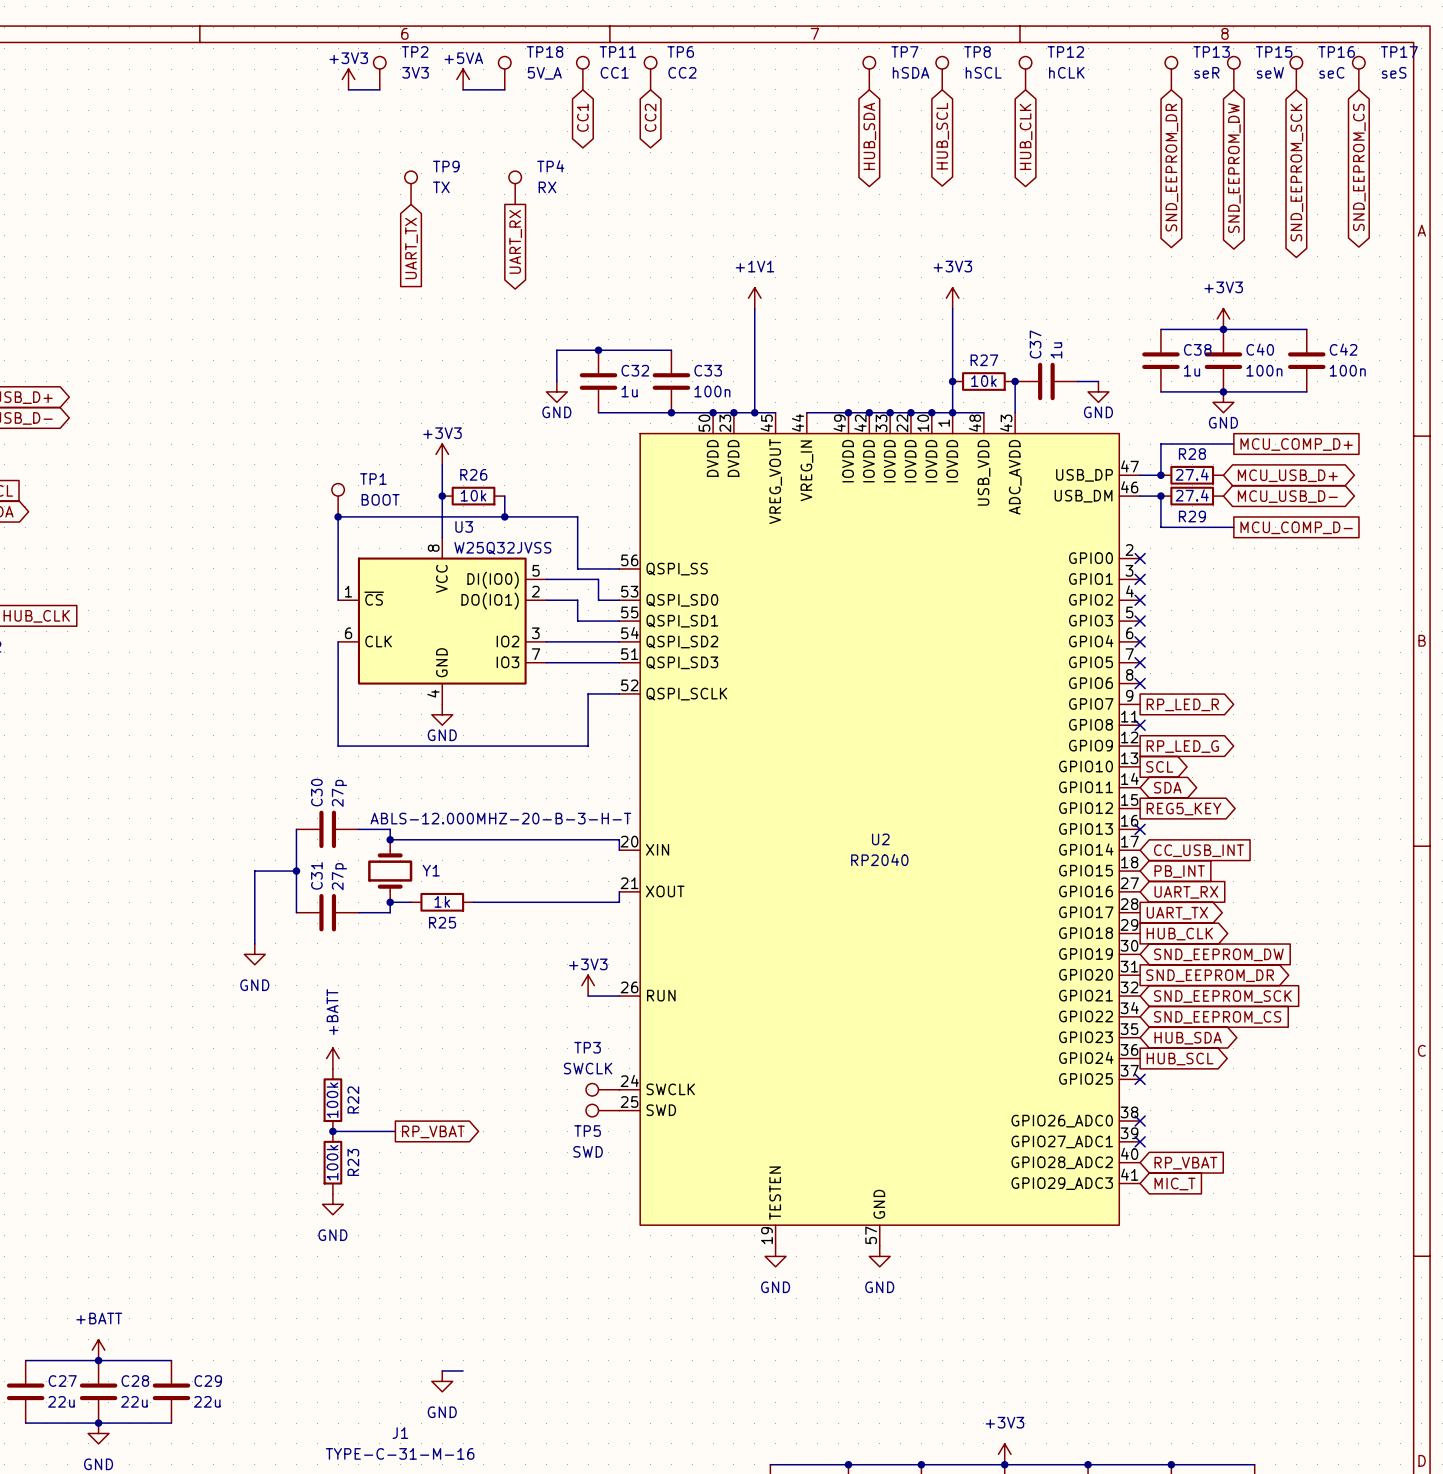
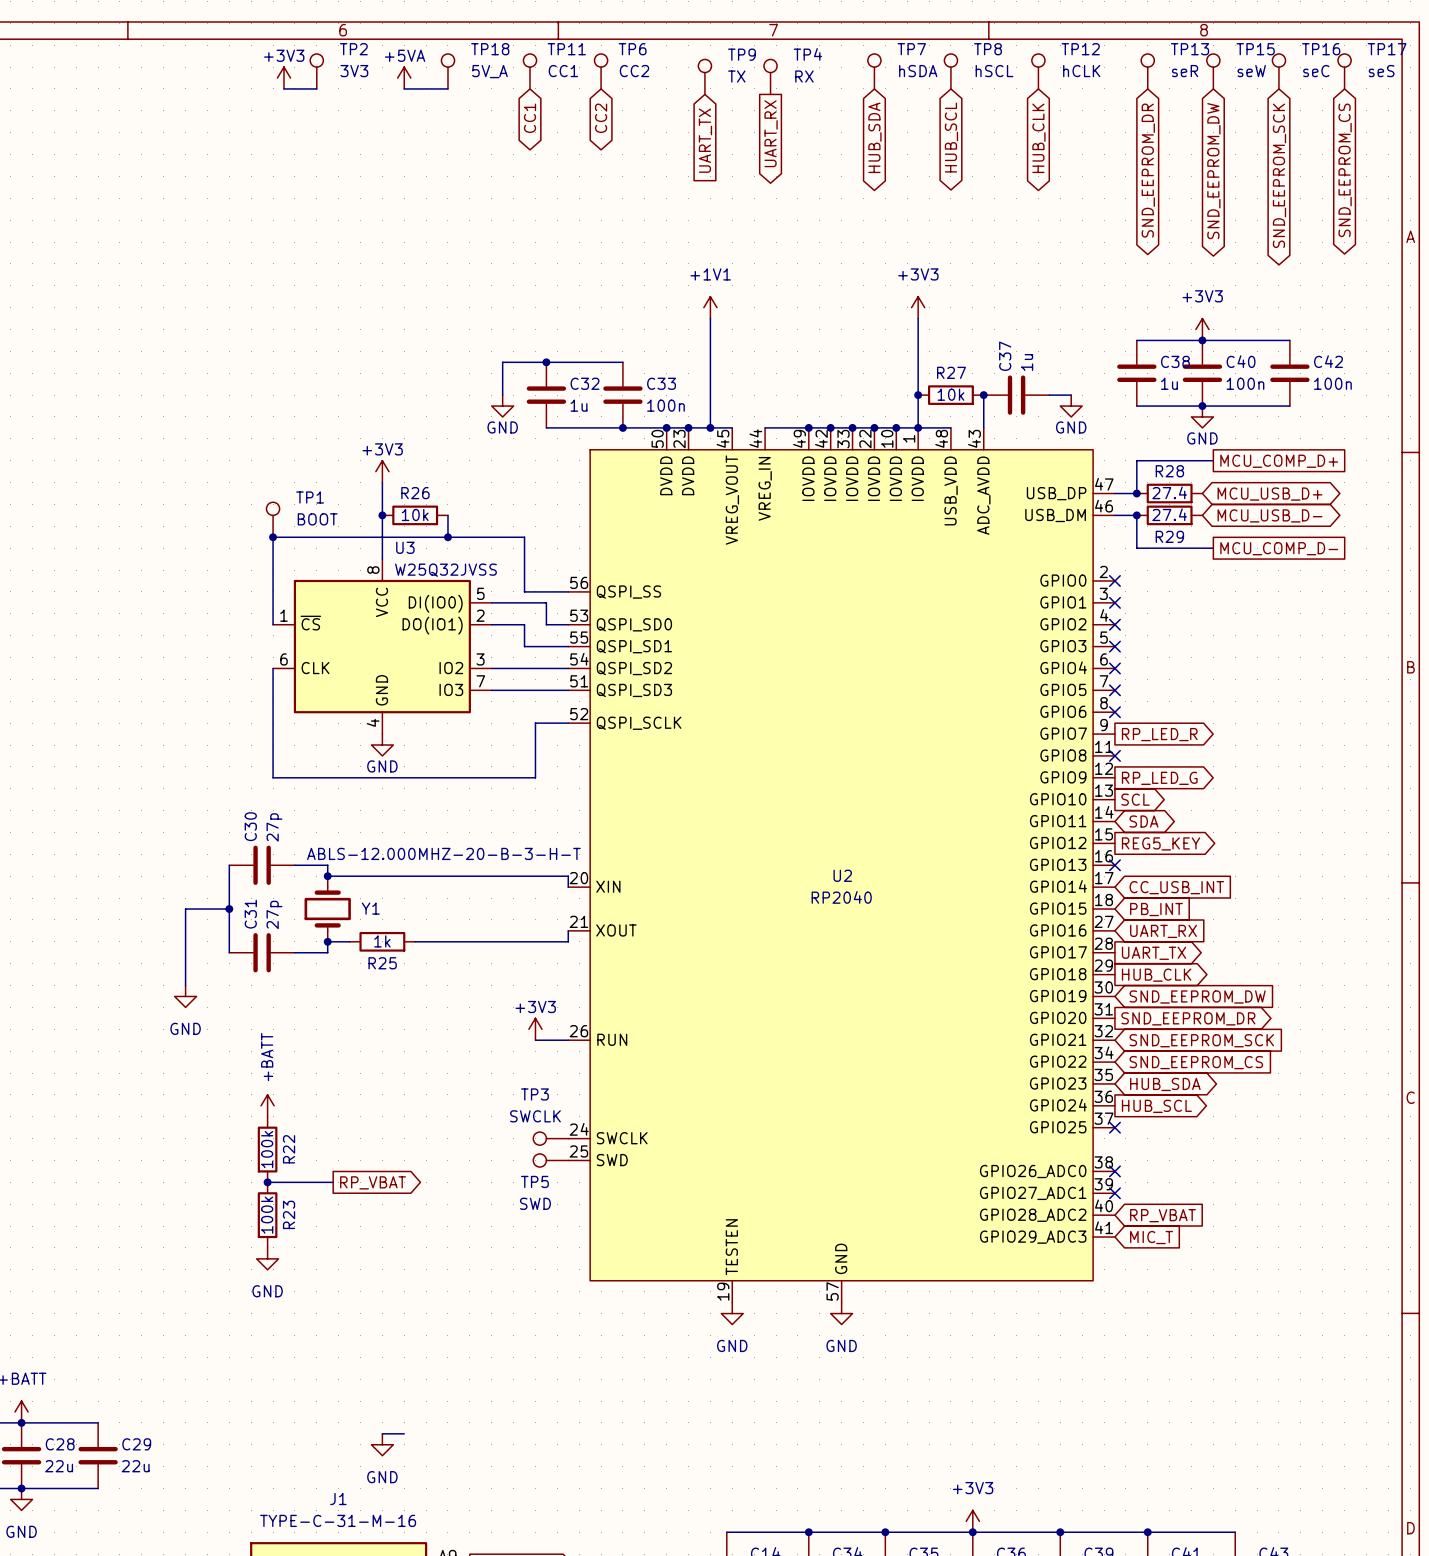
TP7 position: (869, 73) -> (874, 71)
TP8 position: (942, 73) -> (950, 71)
TP12 position: (1025, 73) -> (1038, 71)
global label: none -> UART_RX (771, 133)
global label position: HUB_SDA (869, 136) -> HUB_SDA (874, 137)
global label position: HUB_SCL (942, 136) -> HUB_SCL (951, 137)
global label position: HUB_CLK (1026, 136) -> HUB_CLK (1038, 138)
global label: none -> UART_TX (705, 140)
TP9 position: (411, 187) -> (704, 76)
TP4 position: (515, 187) -> (770, 76)
global label: UART_RX (515, 241) -> none
global label: UART_TX (411, 248) -> none

